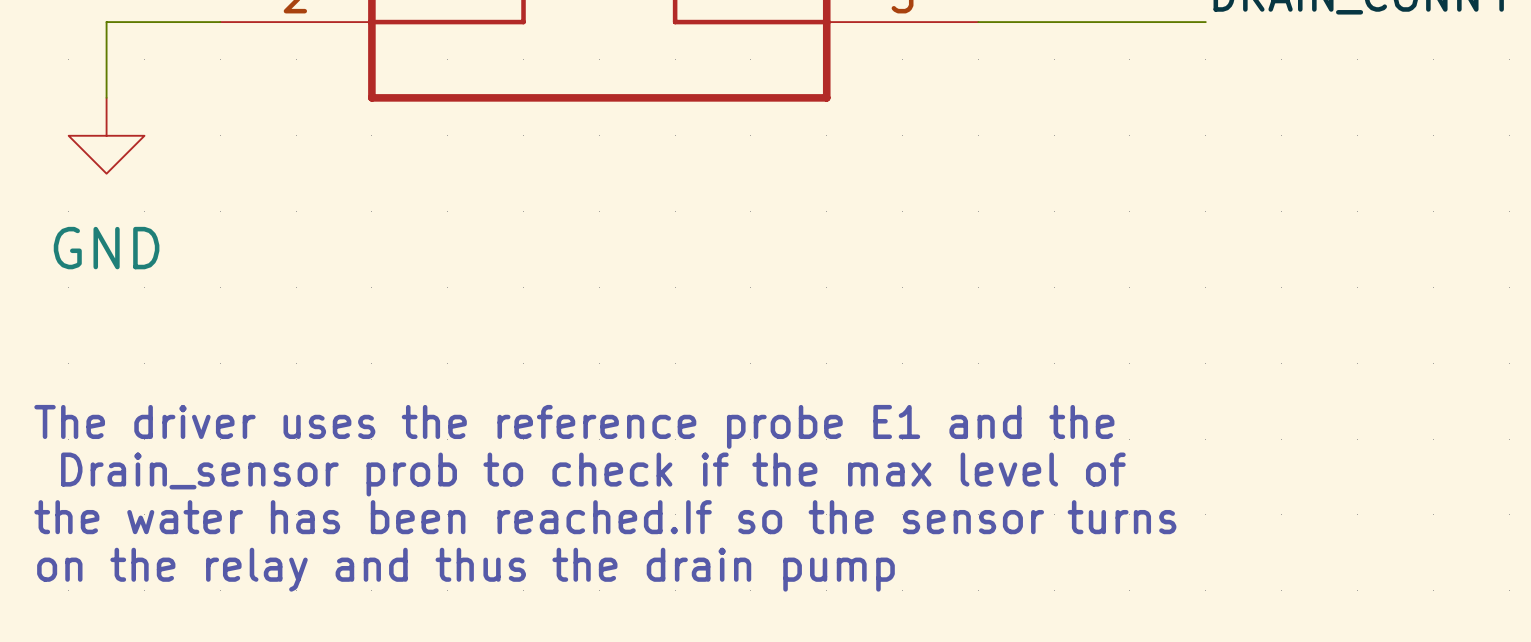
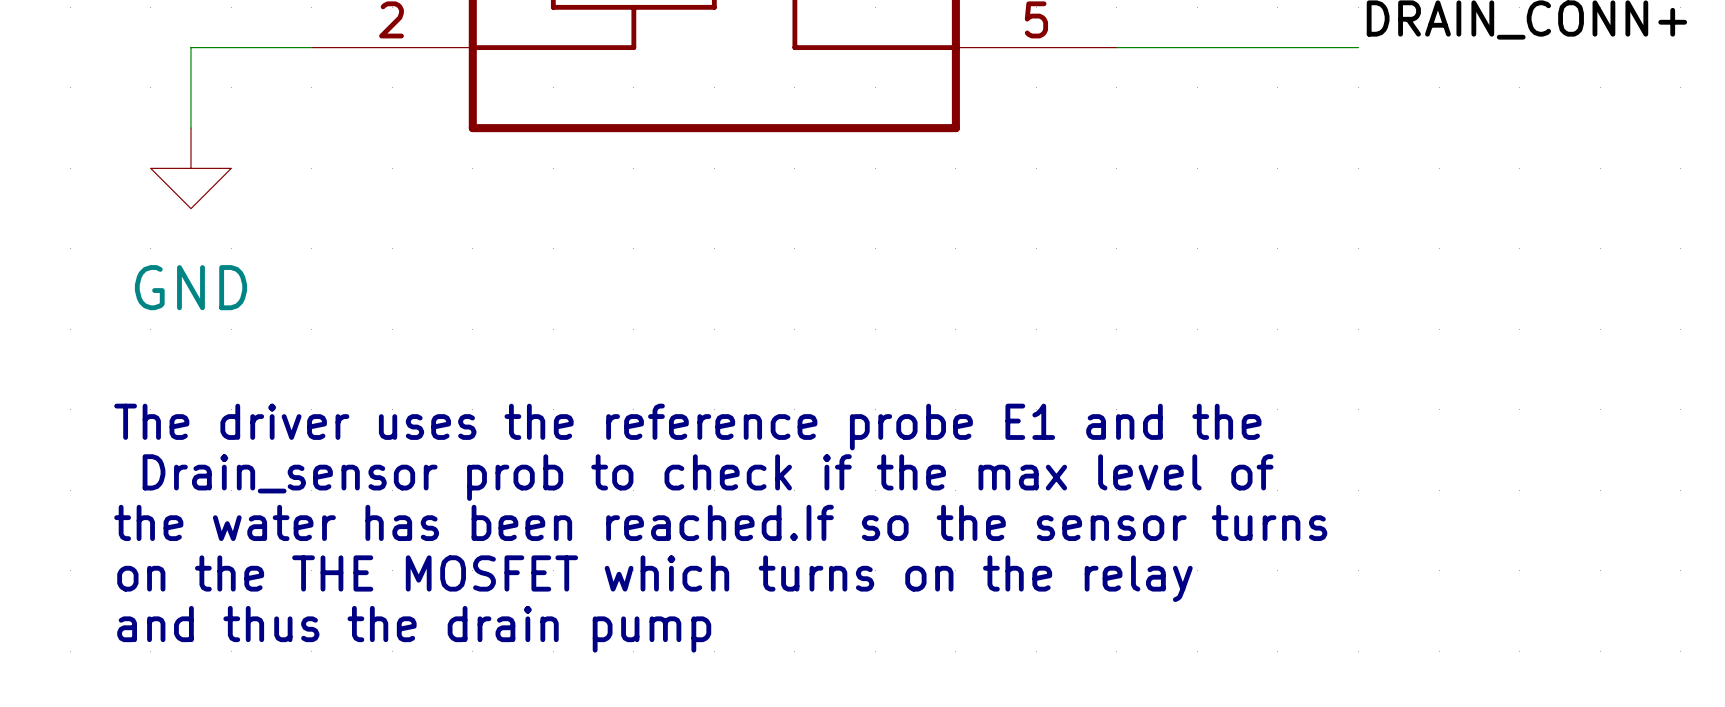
text: none -> The driver uses the reference probe E1 and the (687, 427)
text: The driver uses the reference probe E1 and the (574, 426) -> Drain_sensor prob to check if the max level of (708, 477)
text: Drain_sensor prob to check if the max level of (593, 474) -> the water has been reached.If so the sensor turns (720, 522)
text: the water has been reached.If so the sensor turns (605, 517) -> on the THE MOSFET which turns on the relay (654, 578)
text: on the relay and thus the drain pump (465, 569) -> and thus the drain pump (414, 629)

